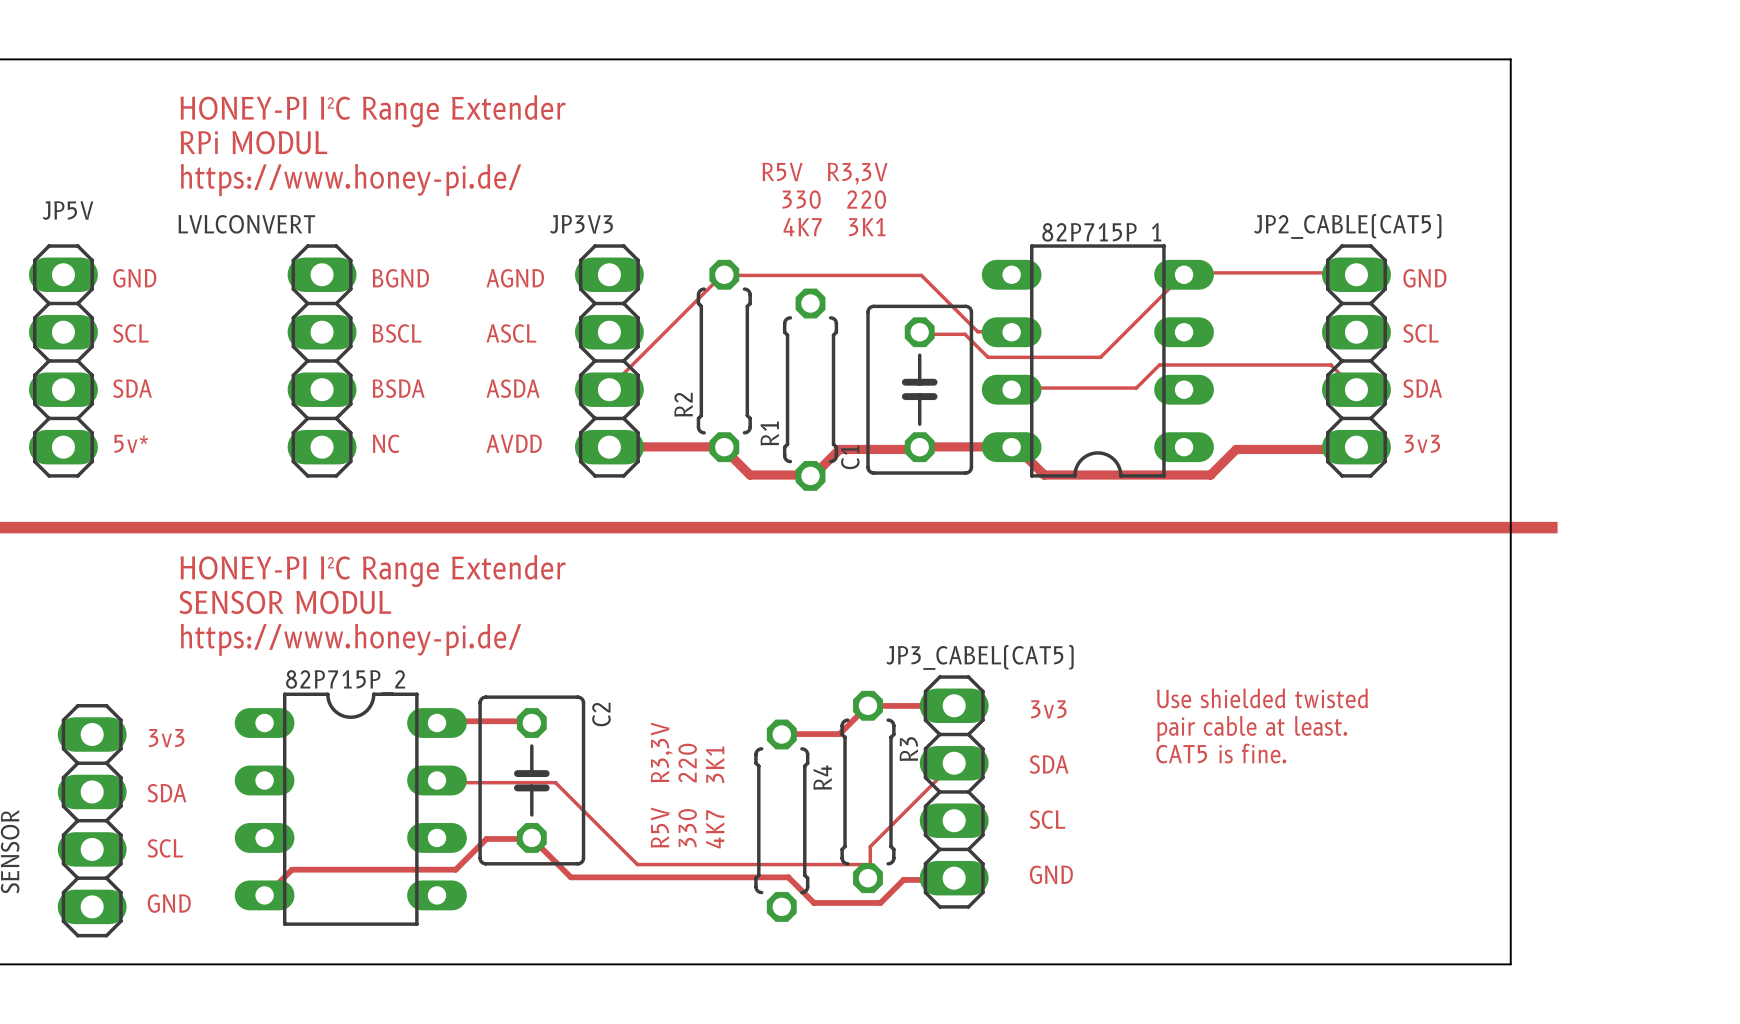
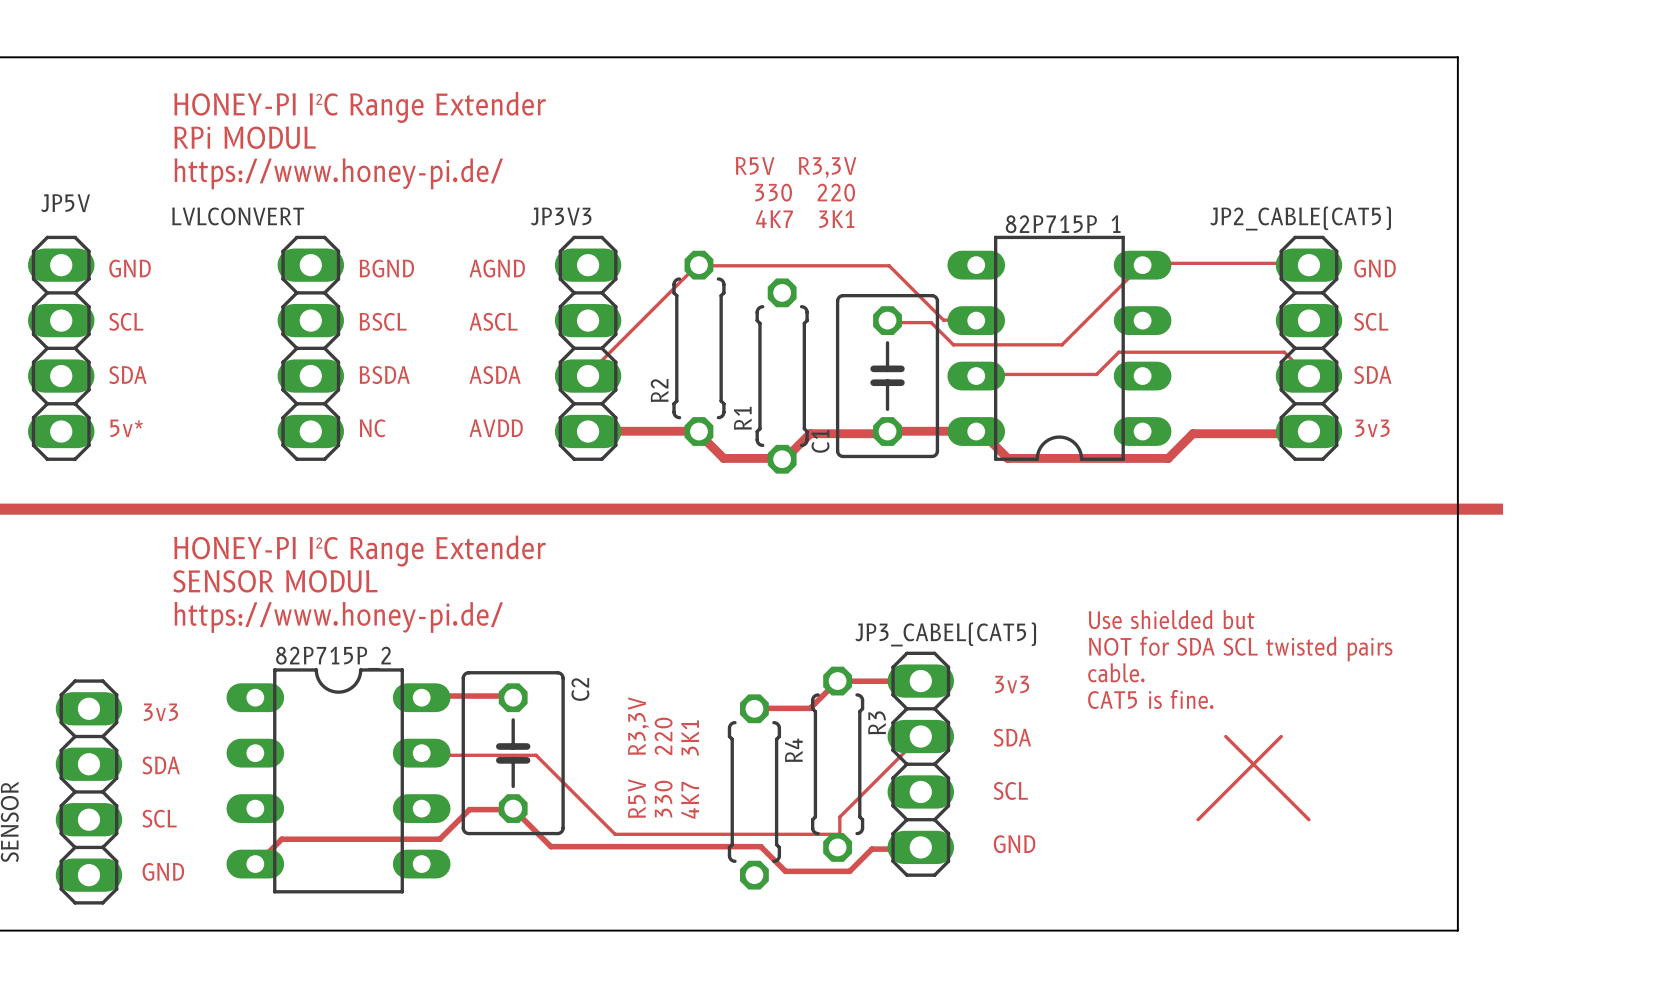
text: none -> Use shielded but (1171, 619)
text: none -> NOT for SDA SCL twisted pairs (1240, 649)
text: none -> cable. (1116, 672)
text: Use shielded twisted (1262, 698) -> none
text: pair cable at least. (1252, 728) -> none
text position: CAT5 is fine. (1221, 753) -> CAT5 is fine. (1150, 699)
track: none -> (1225, 736) (1308, 819)
track: none -> (1281, 736) (1198, 819)

